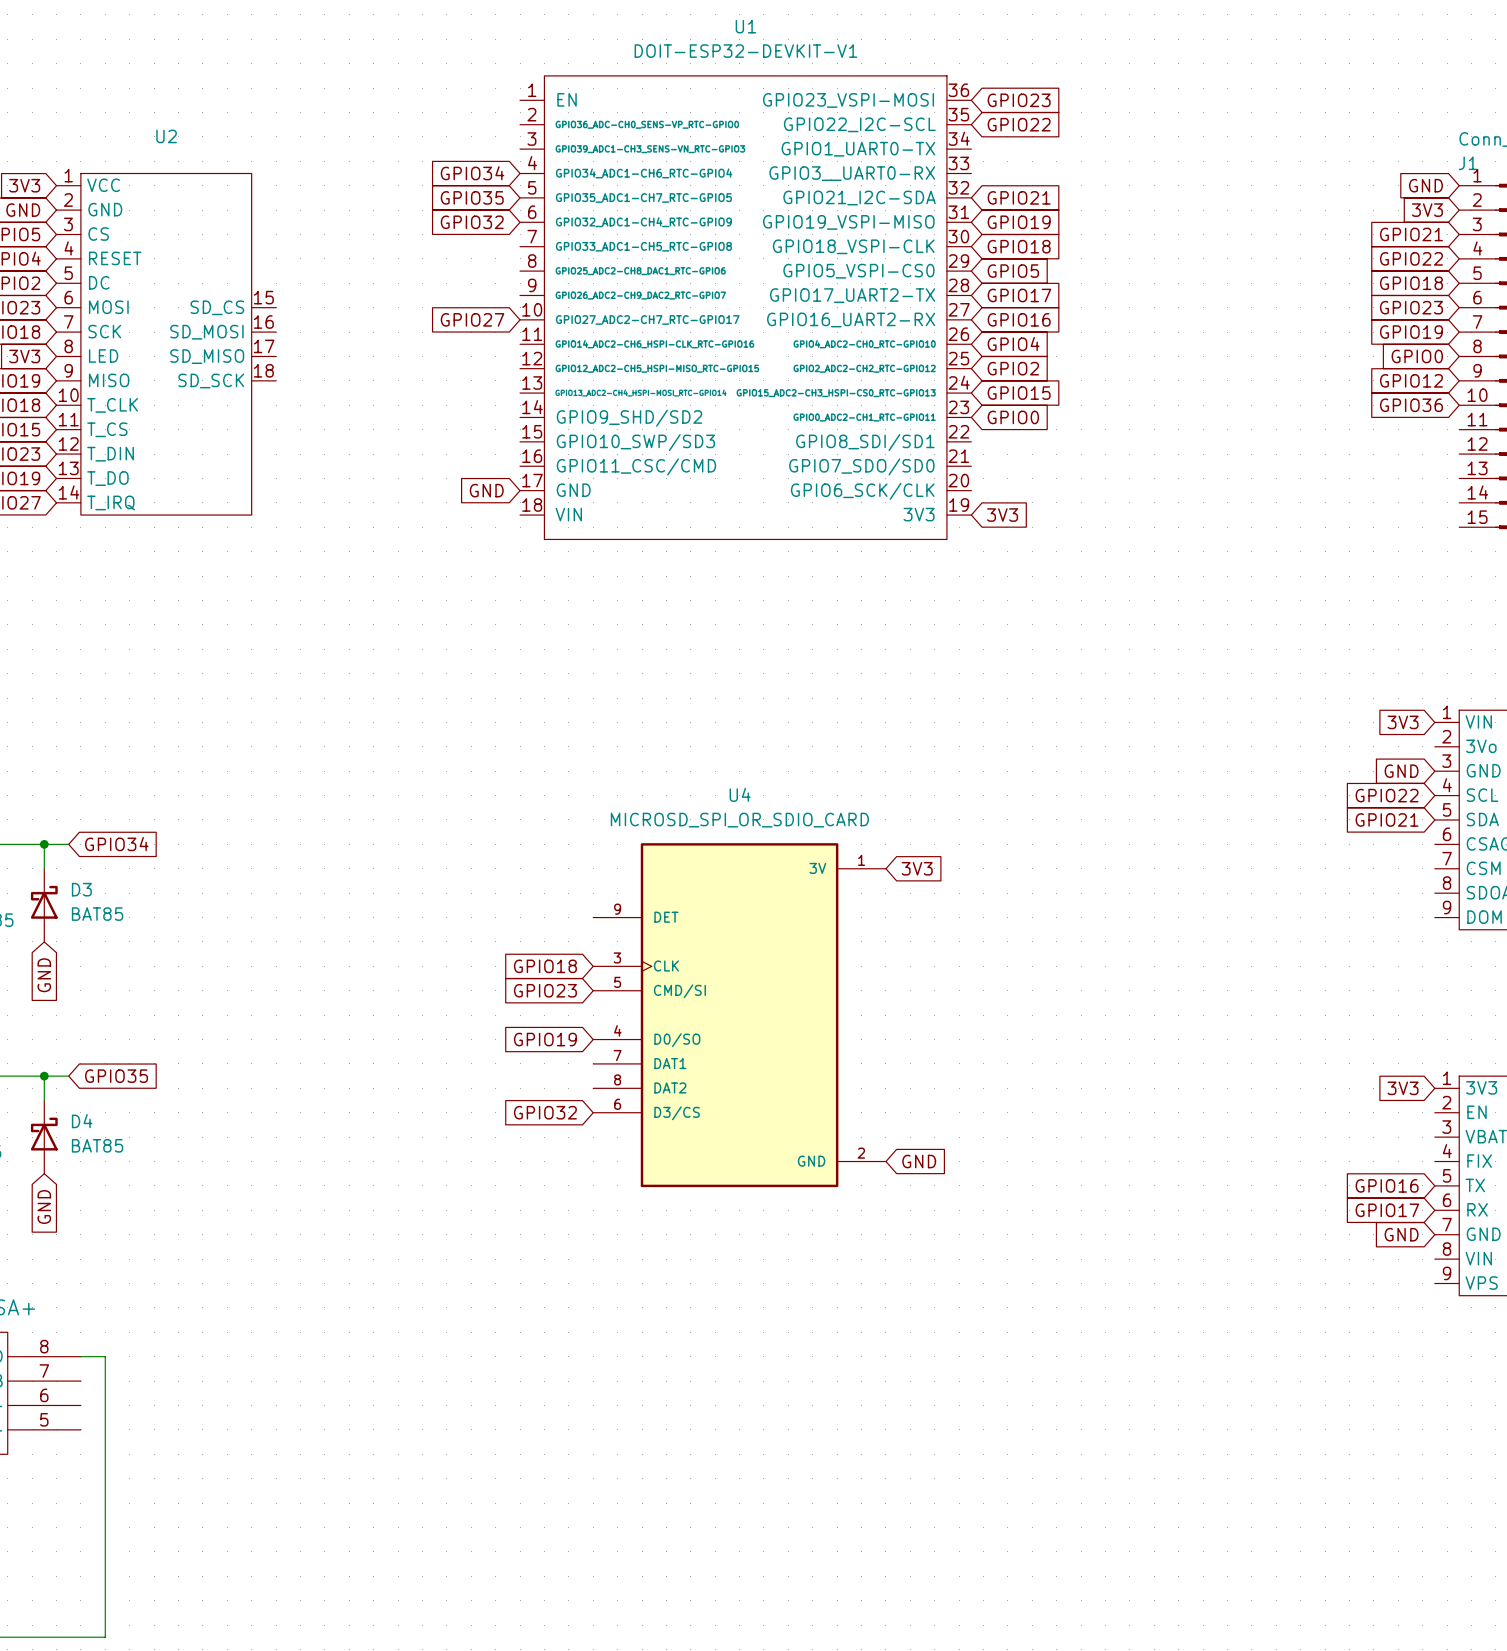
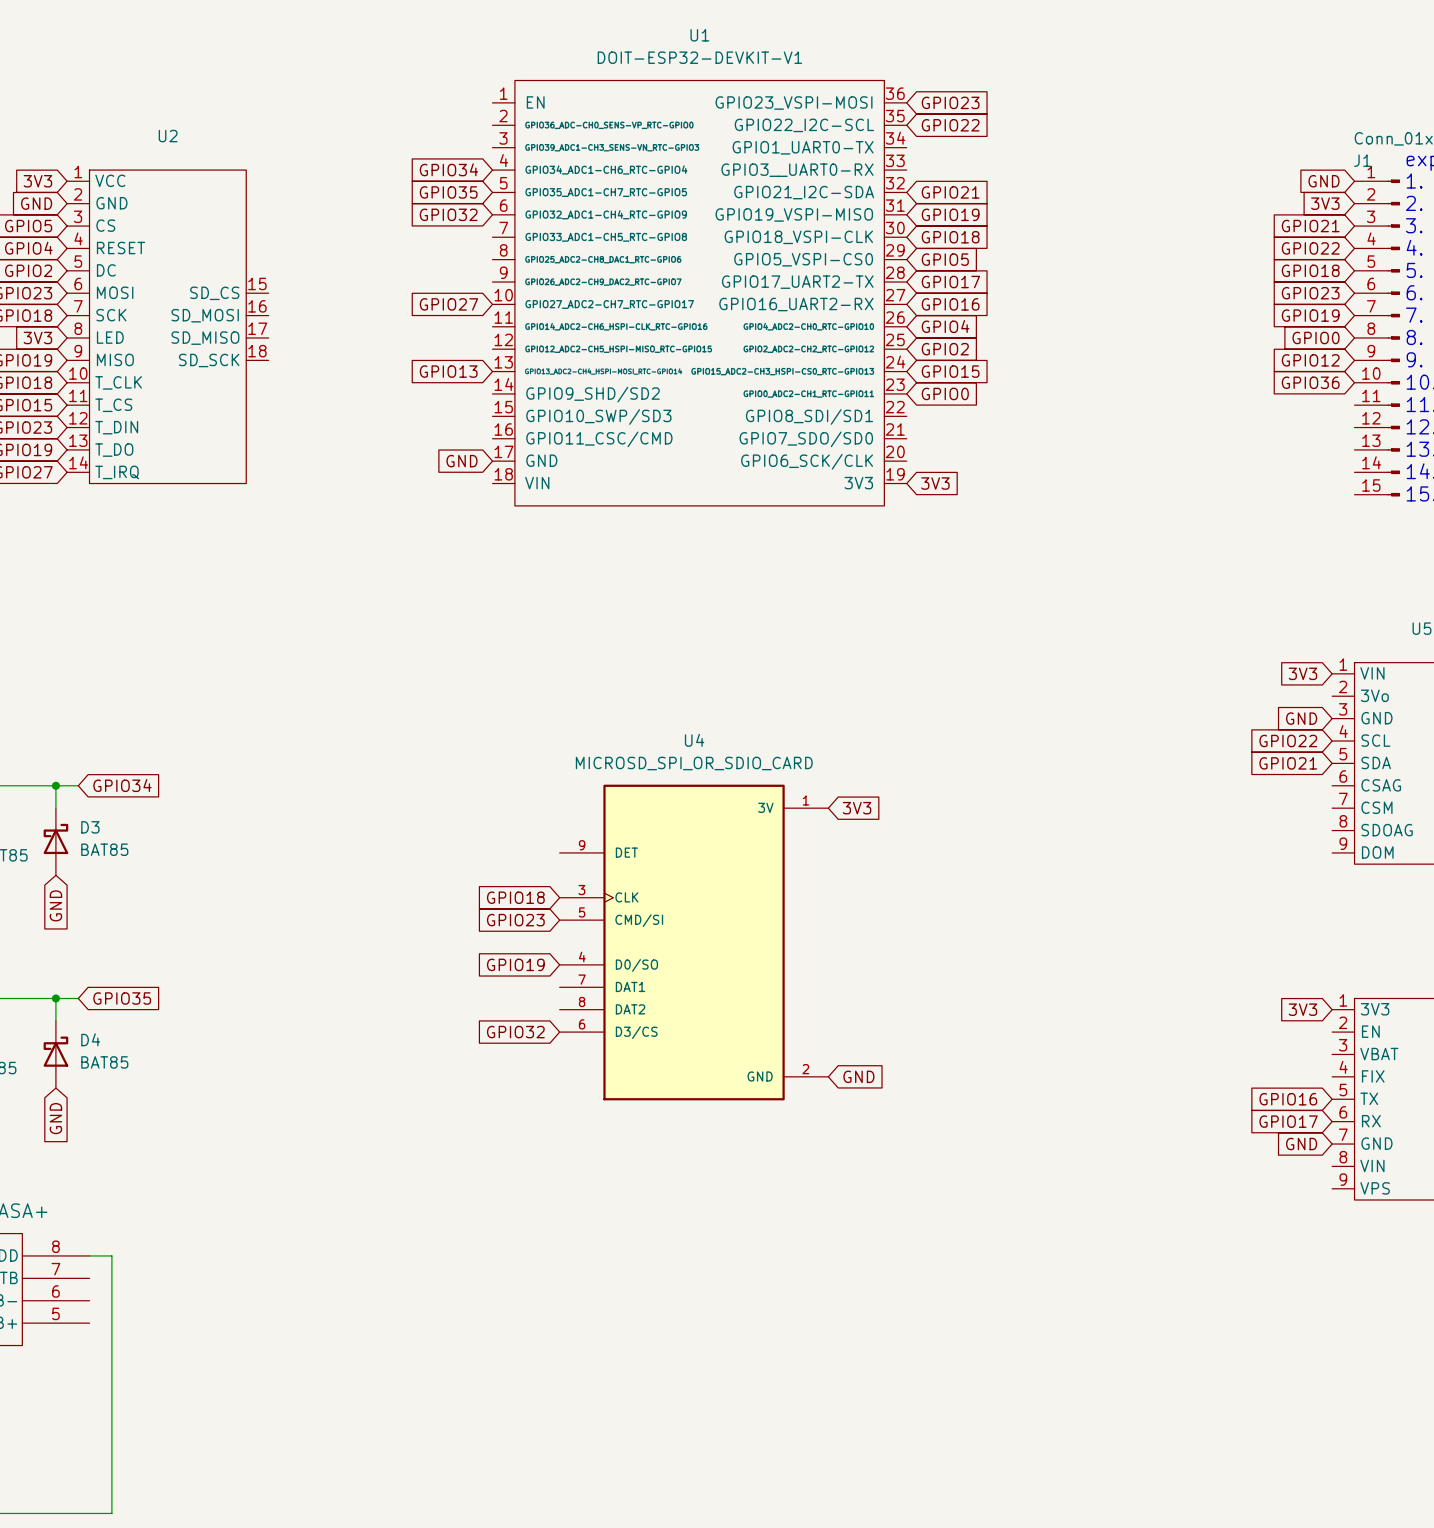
global label: none -> GPIO13 (448, 371)

